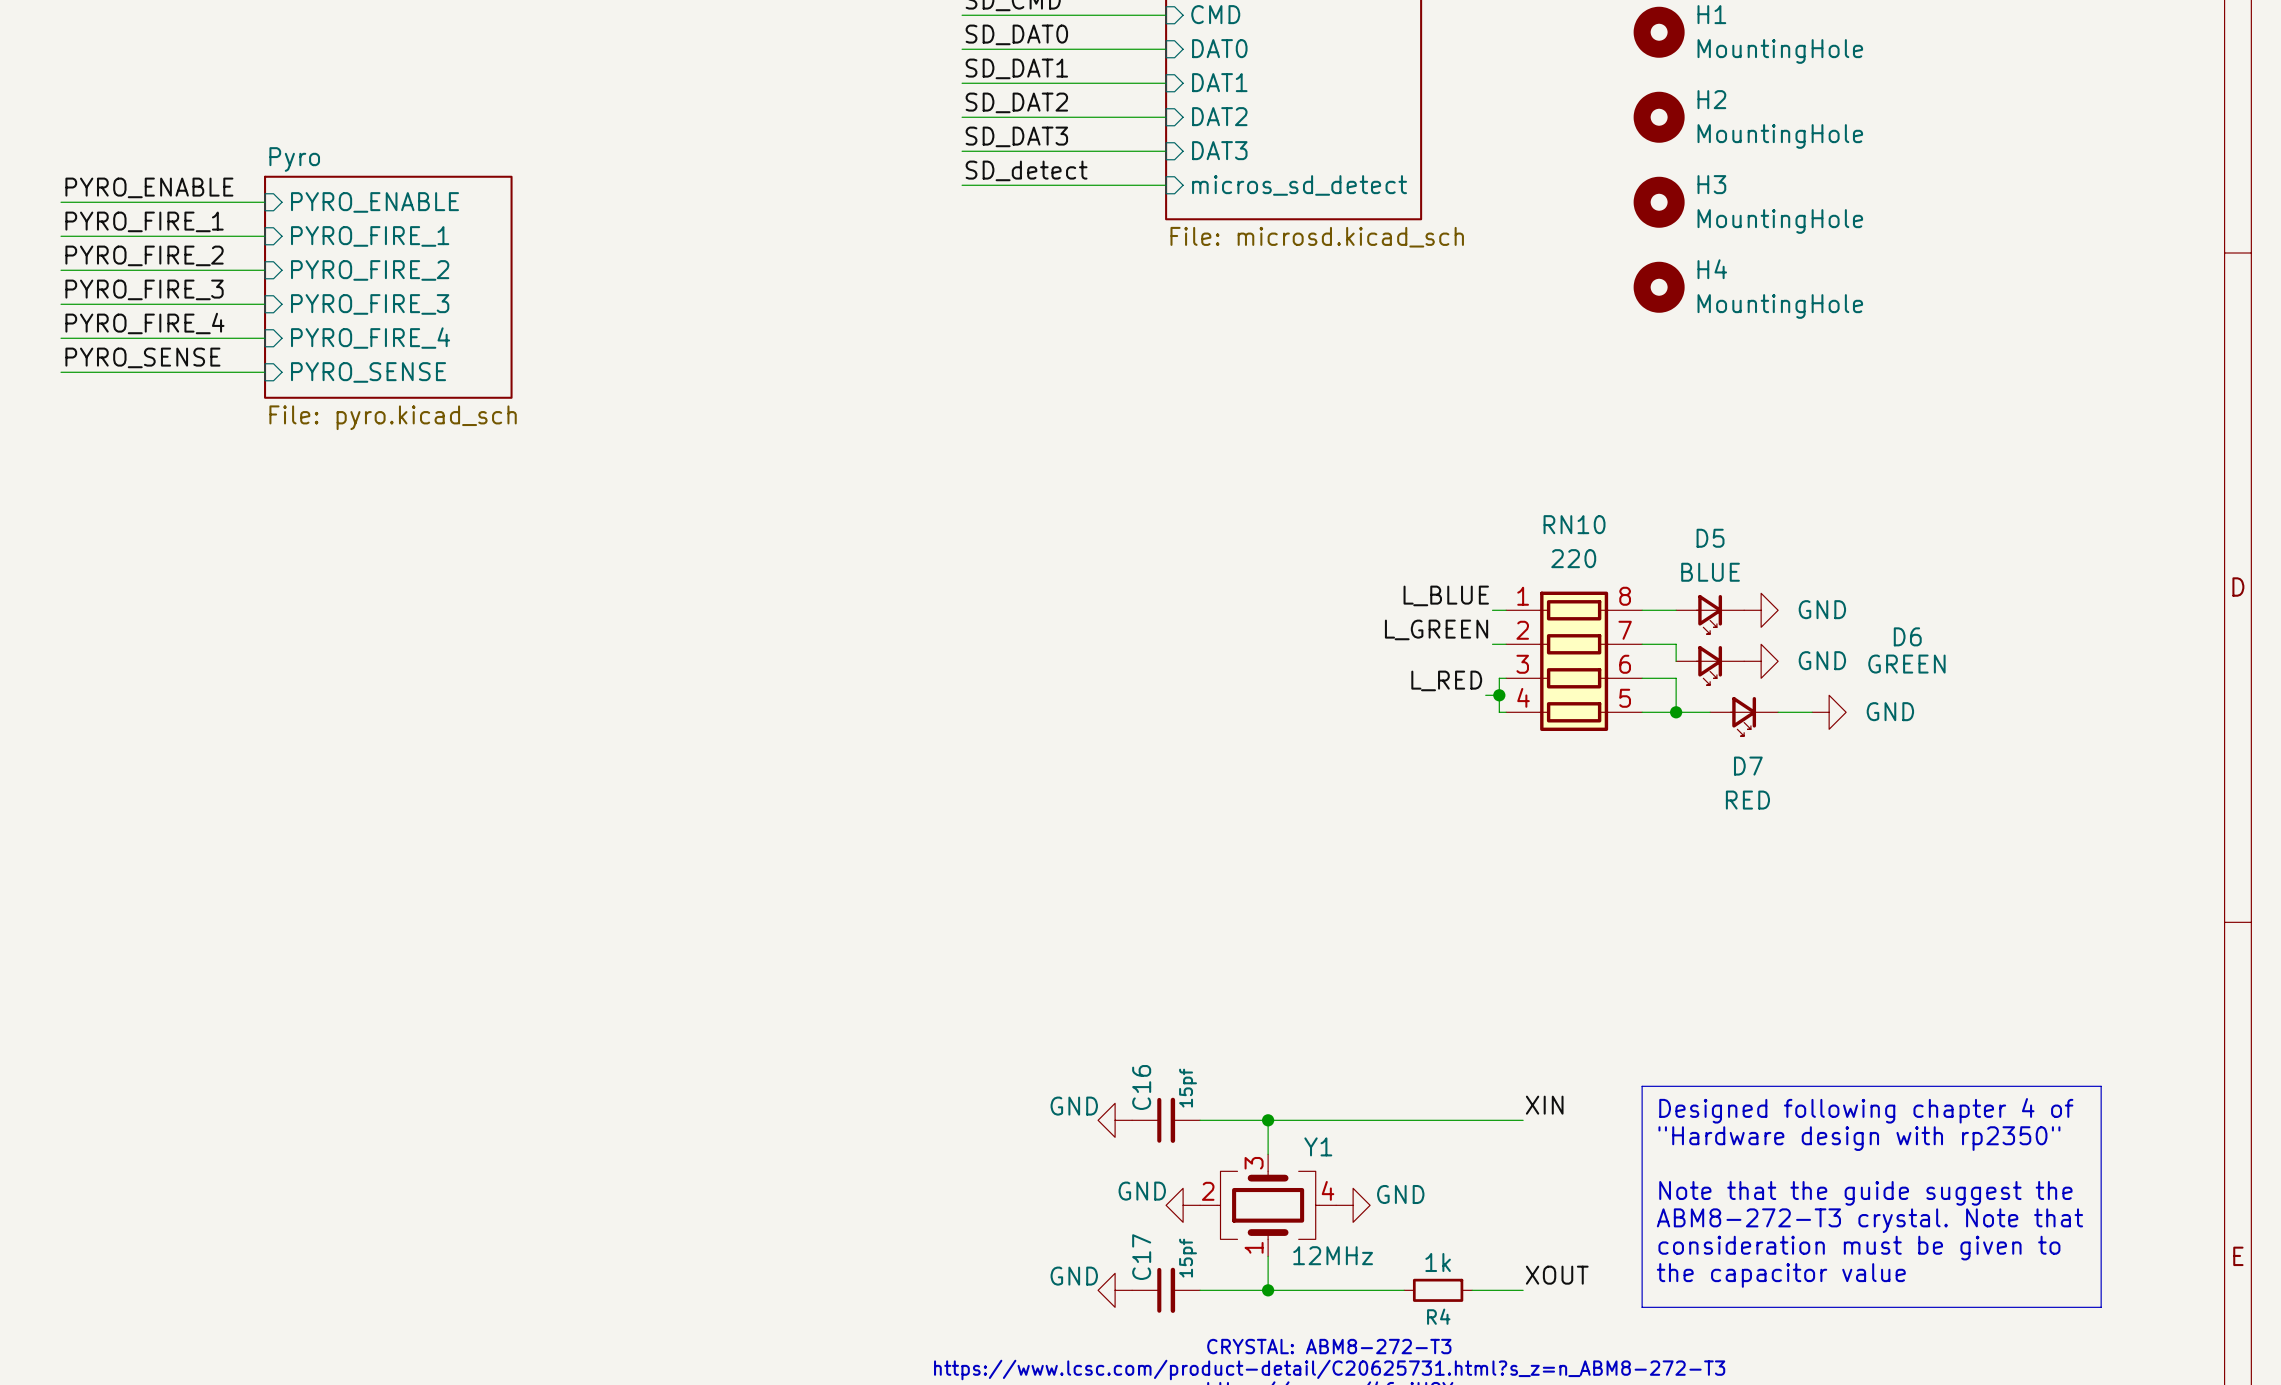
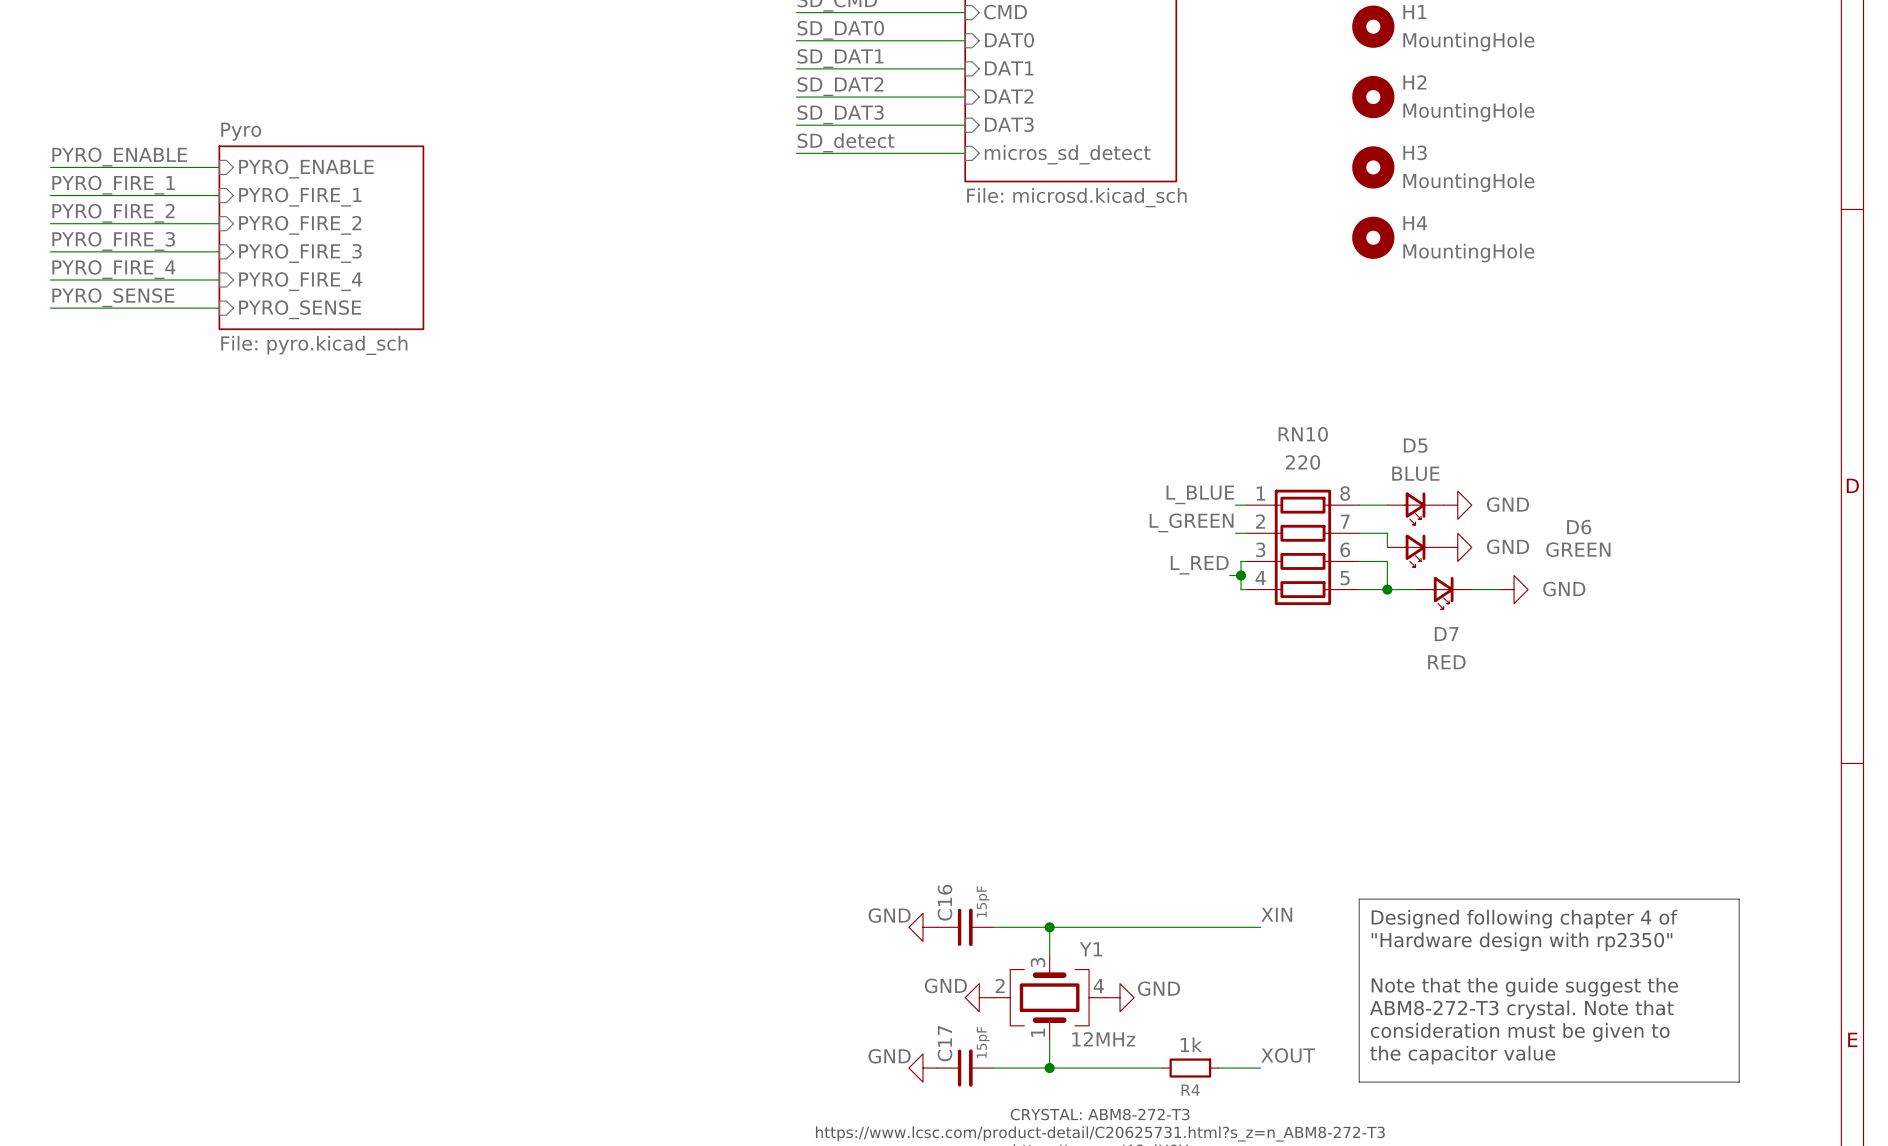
C16 value: 15pf (1188, 1088) -> 15pF (983, 901)
C17 value: 15pf (1188, 1258) -> 15pF (983, 1042)

